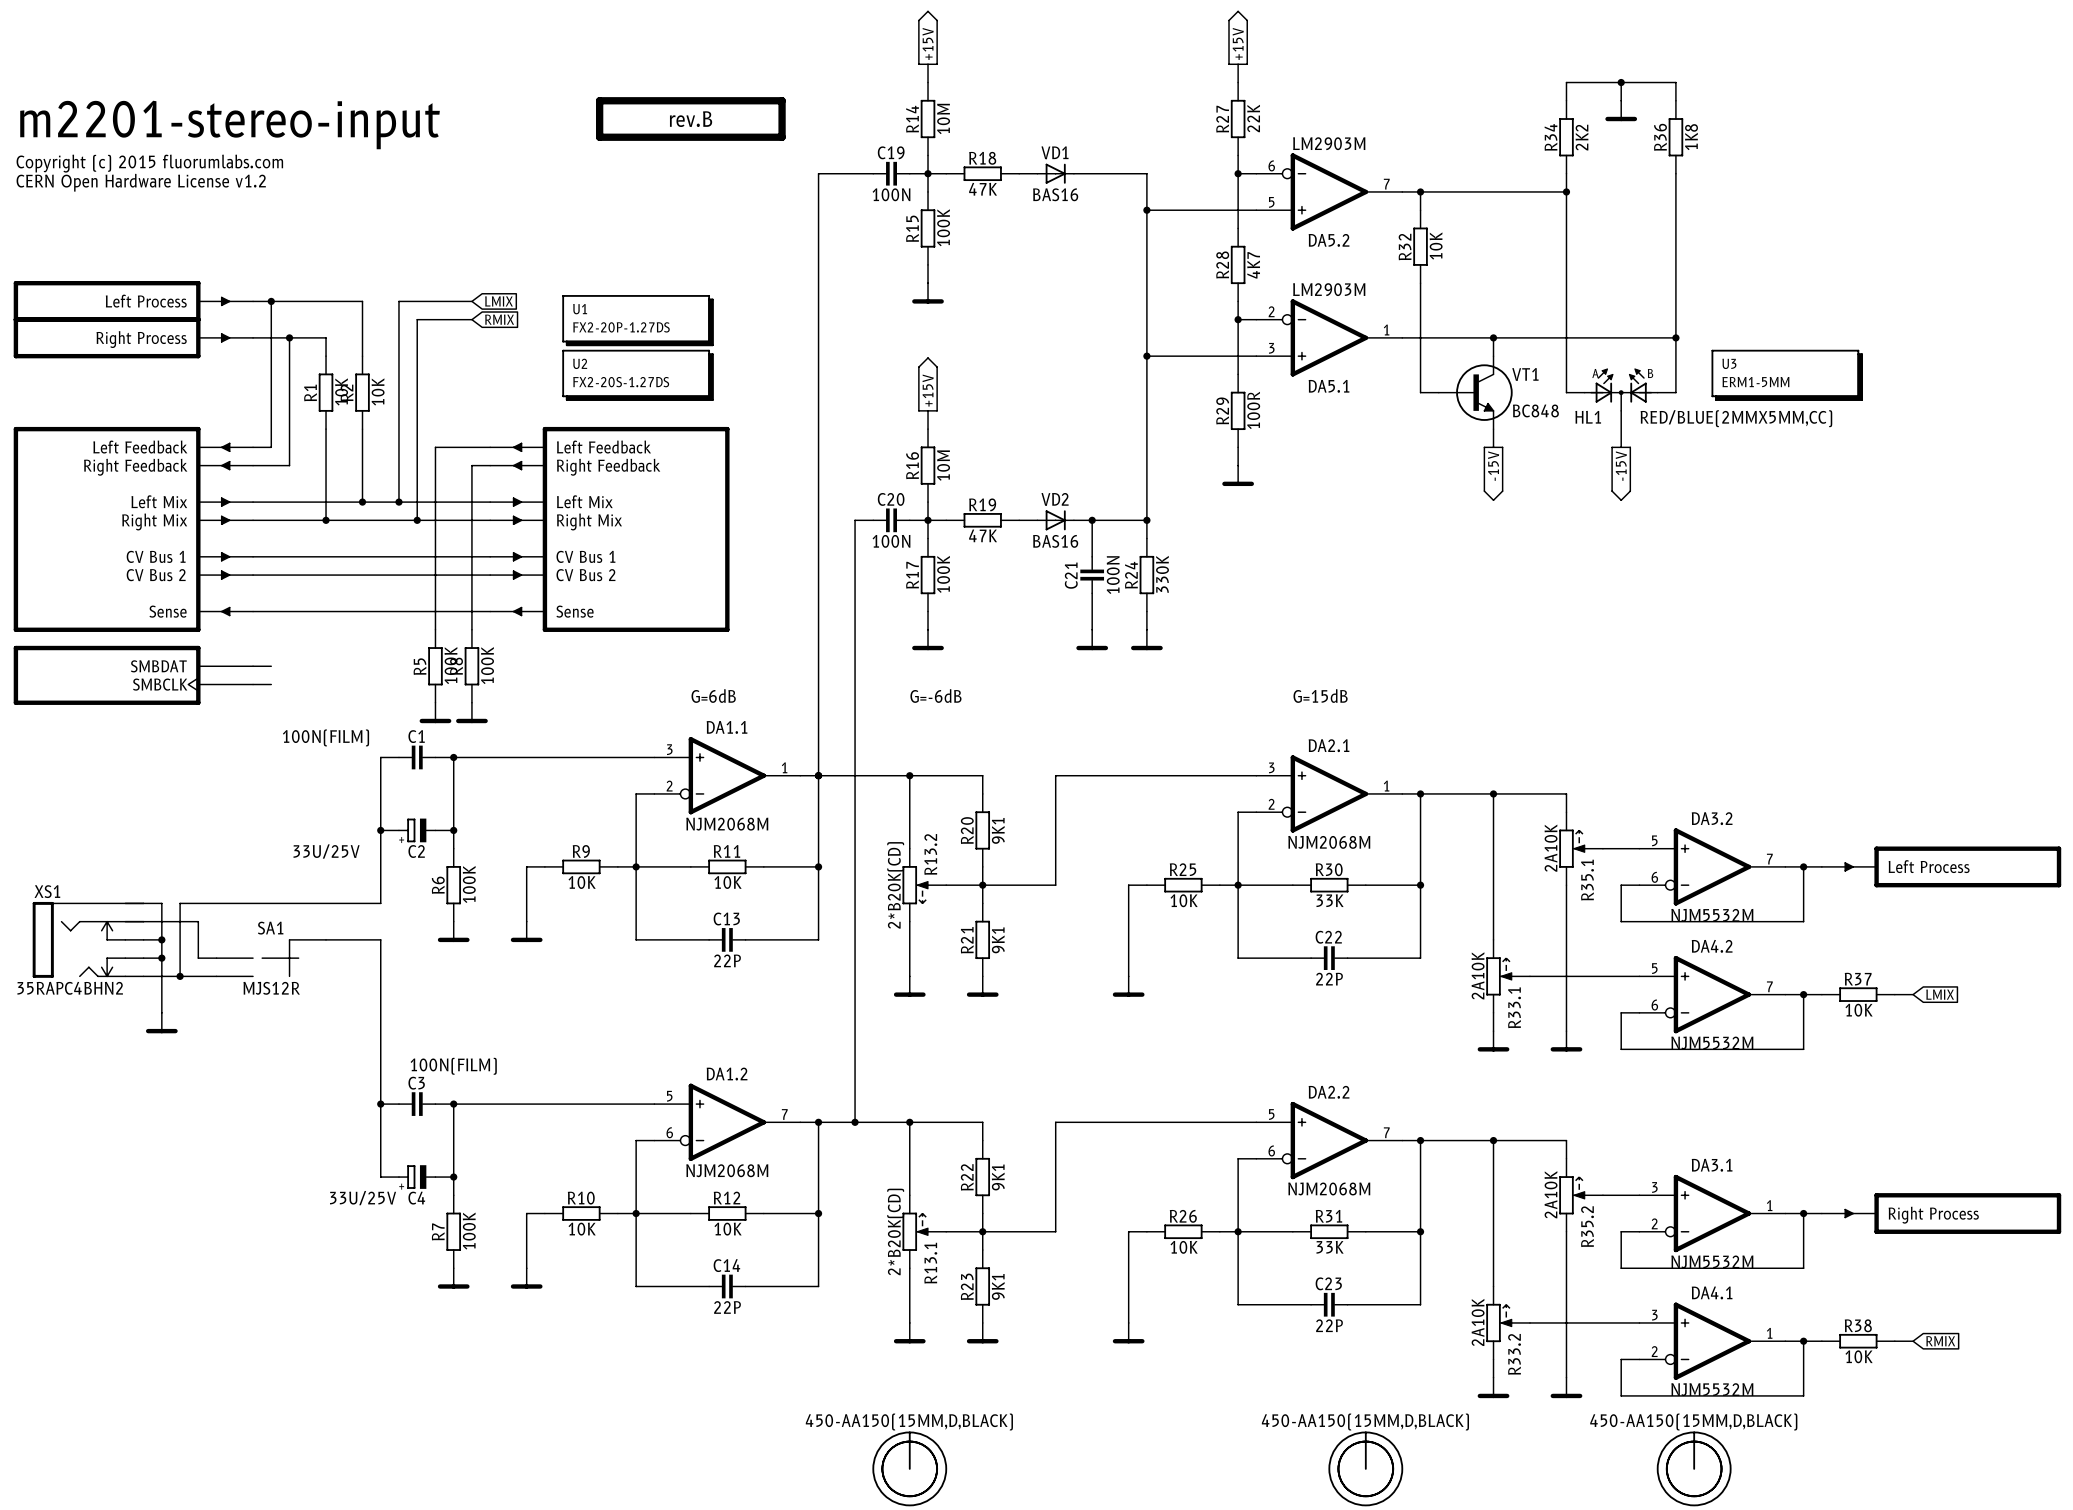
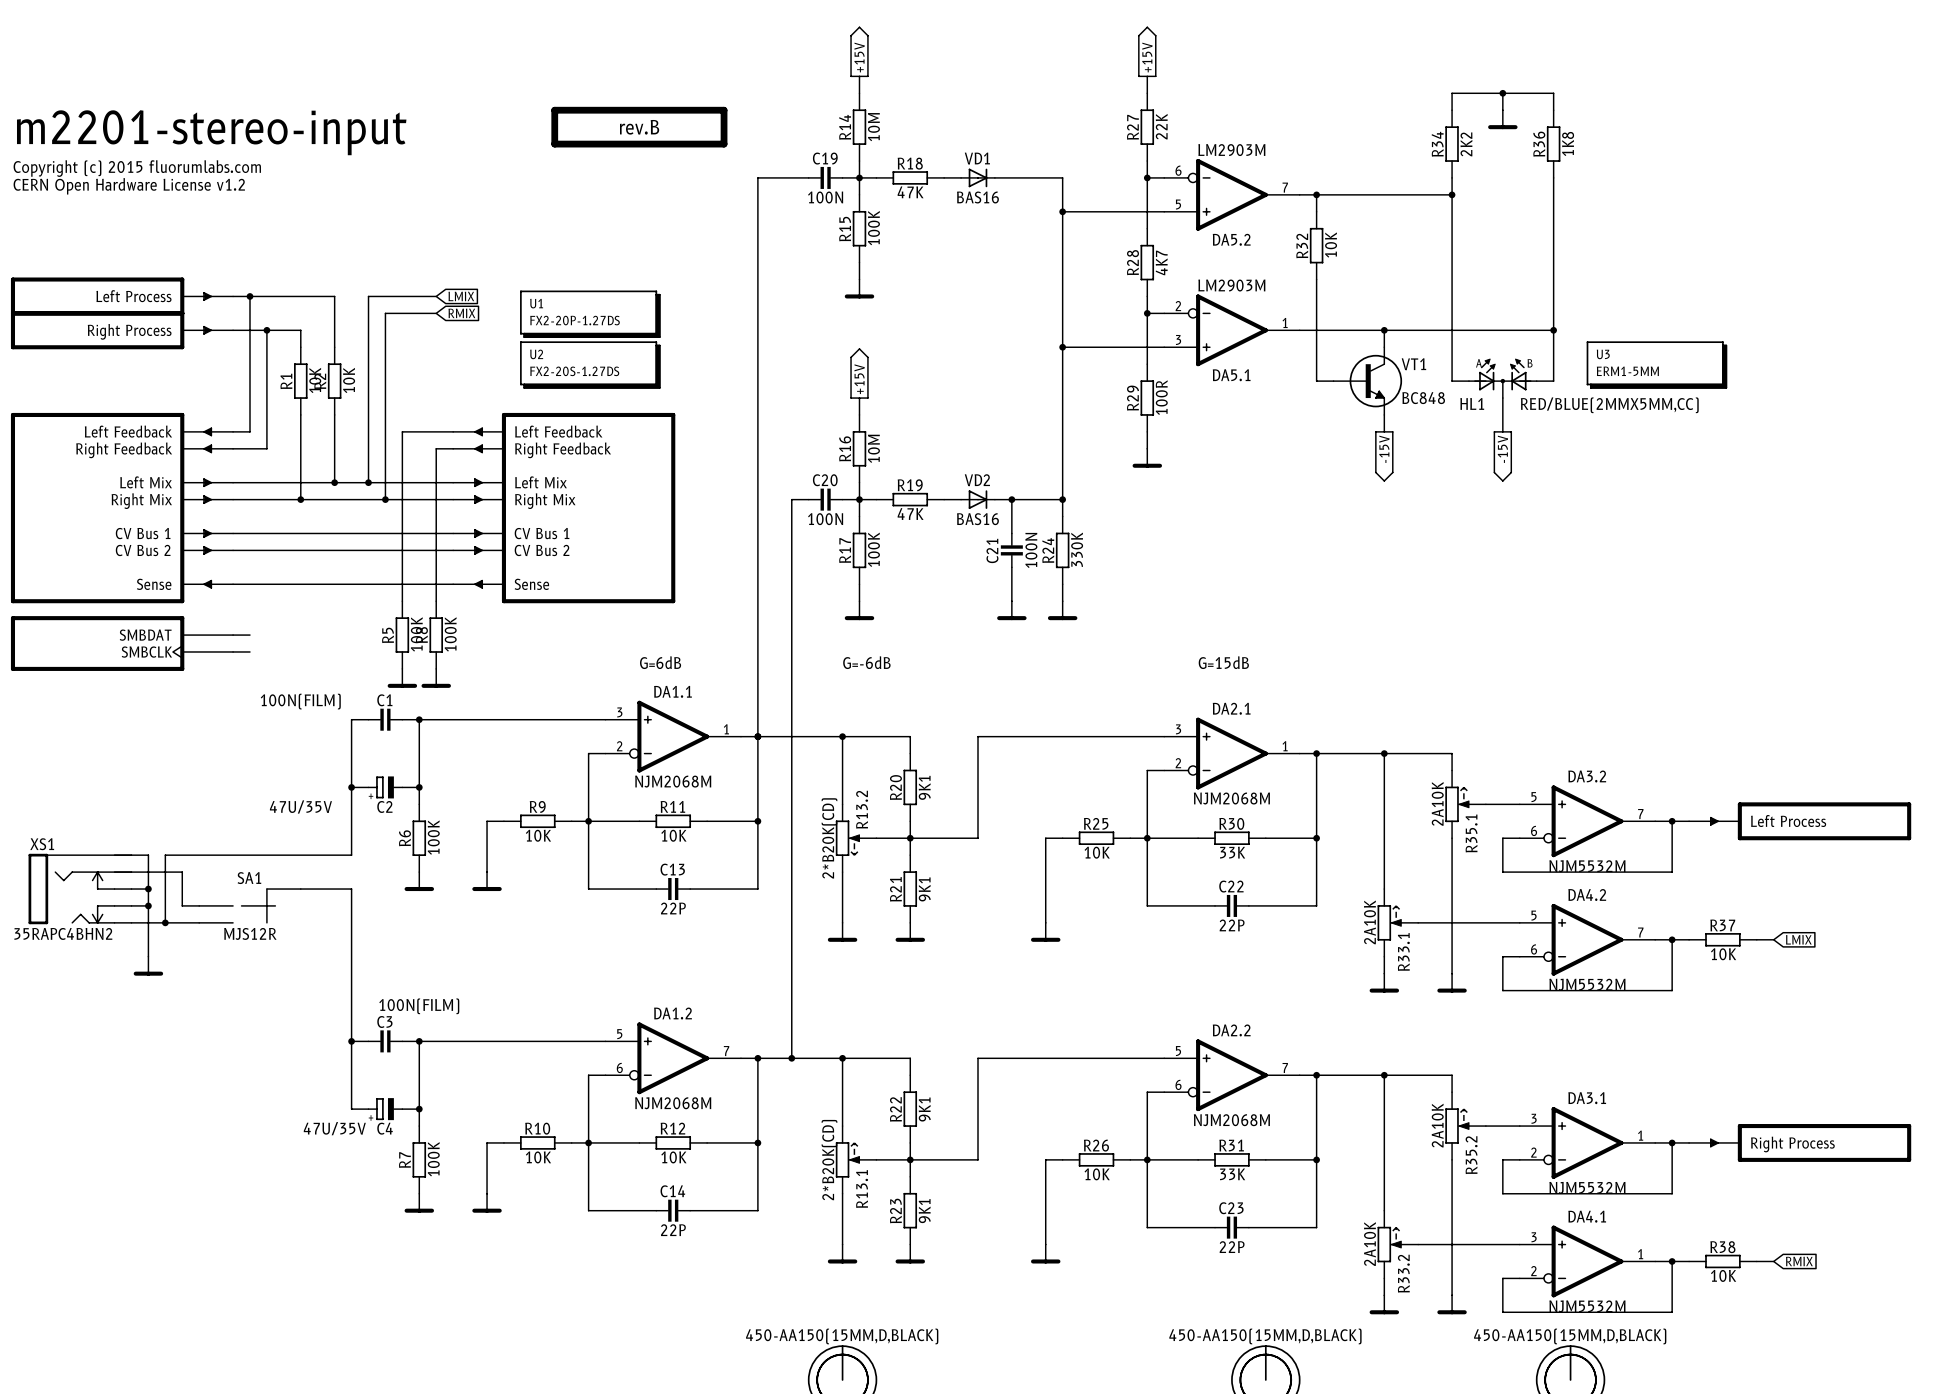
C2 value: 33U/25V (326, 851) -> 47U/35V (300, 806)
C4 value: 33U/25V (363, 1198) -> 47U/35V (334, 1128)

